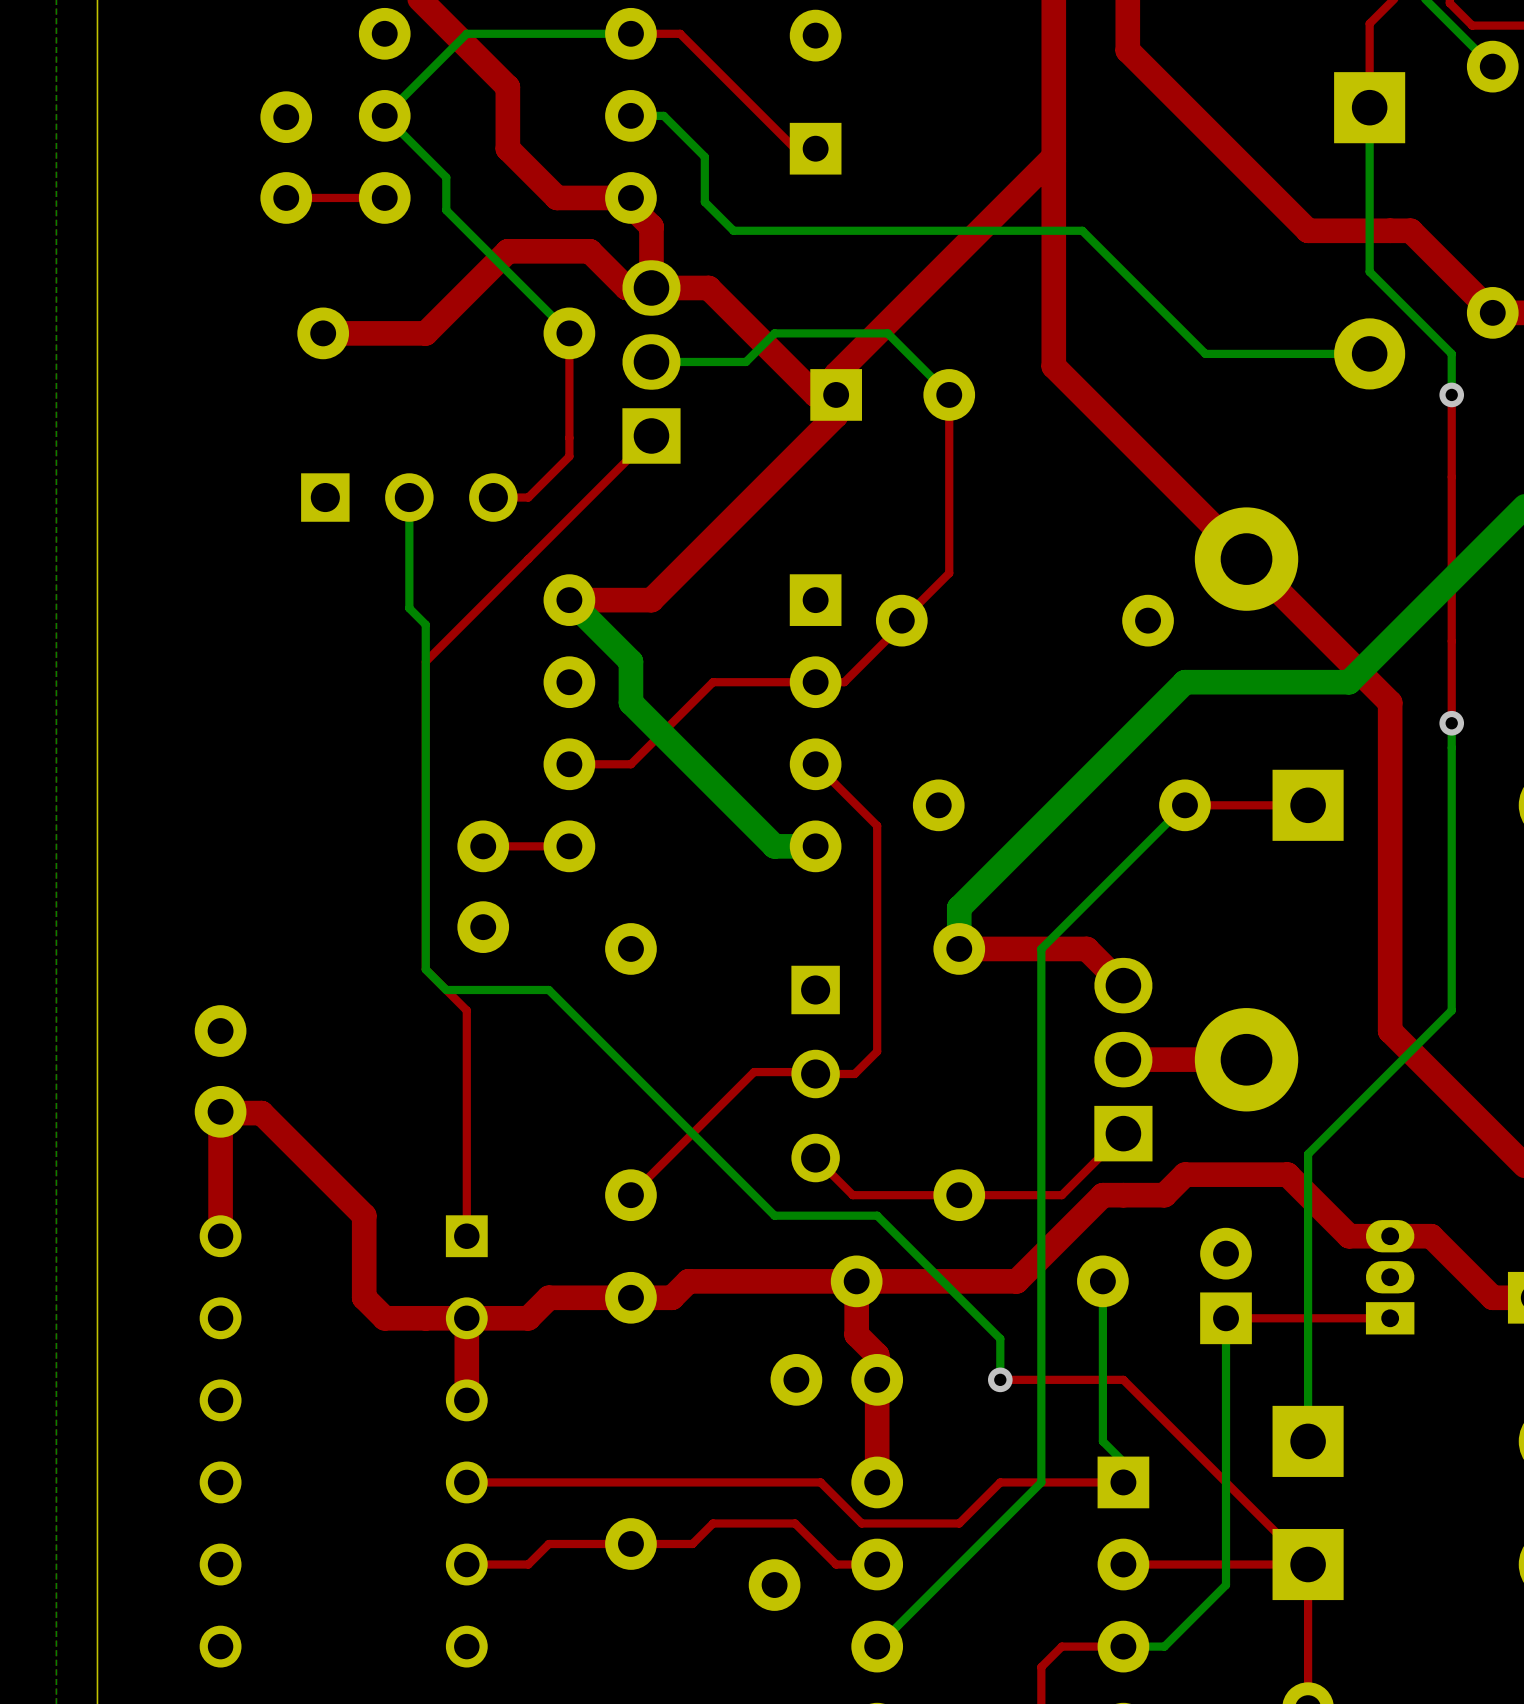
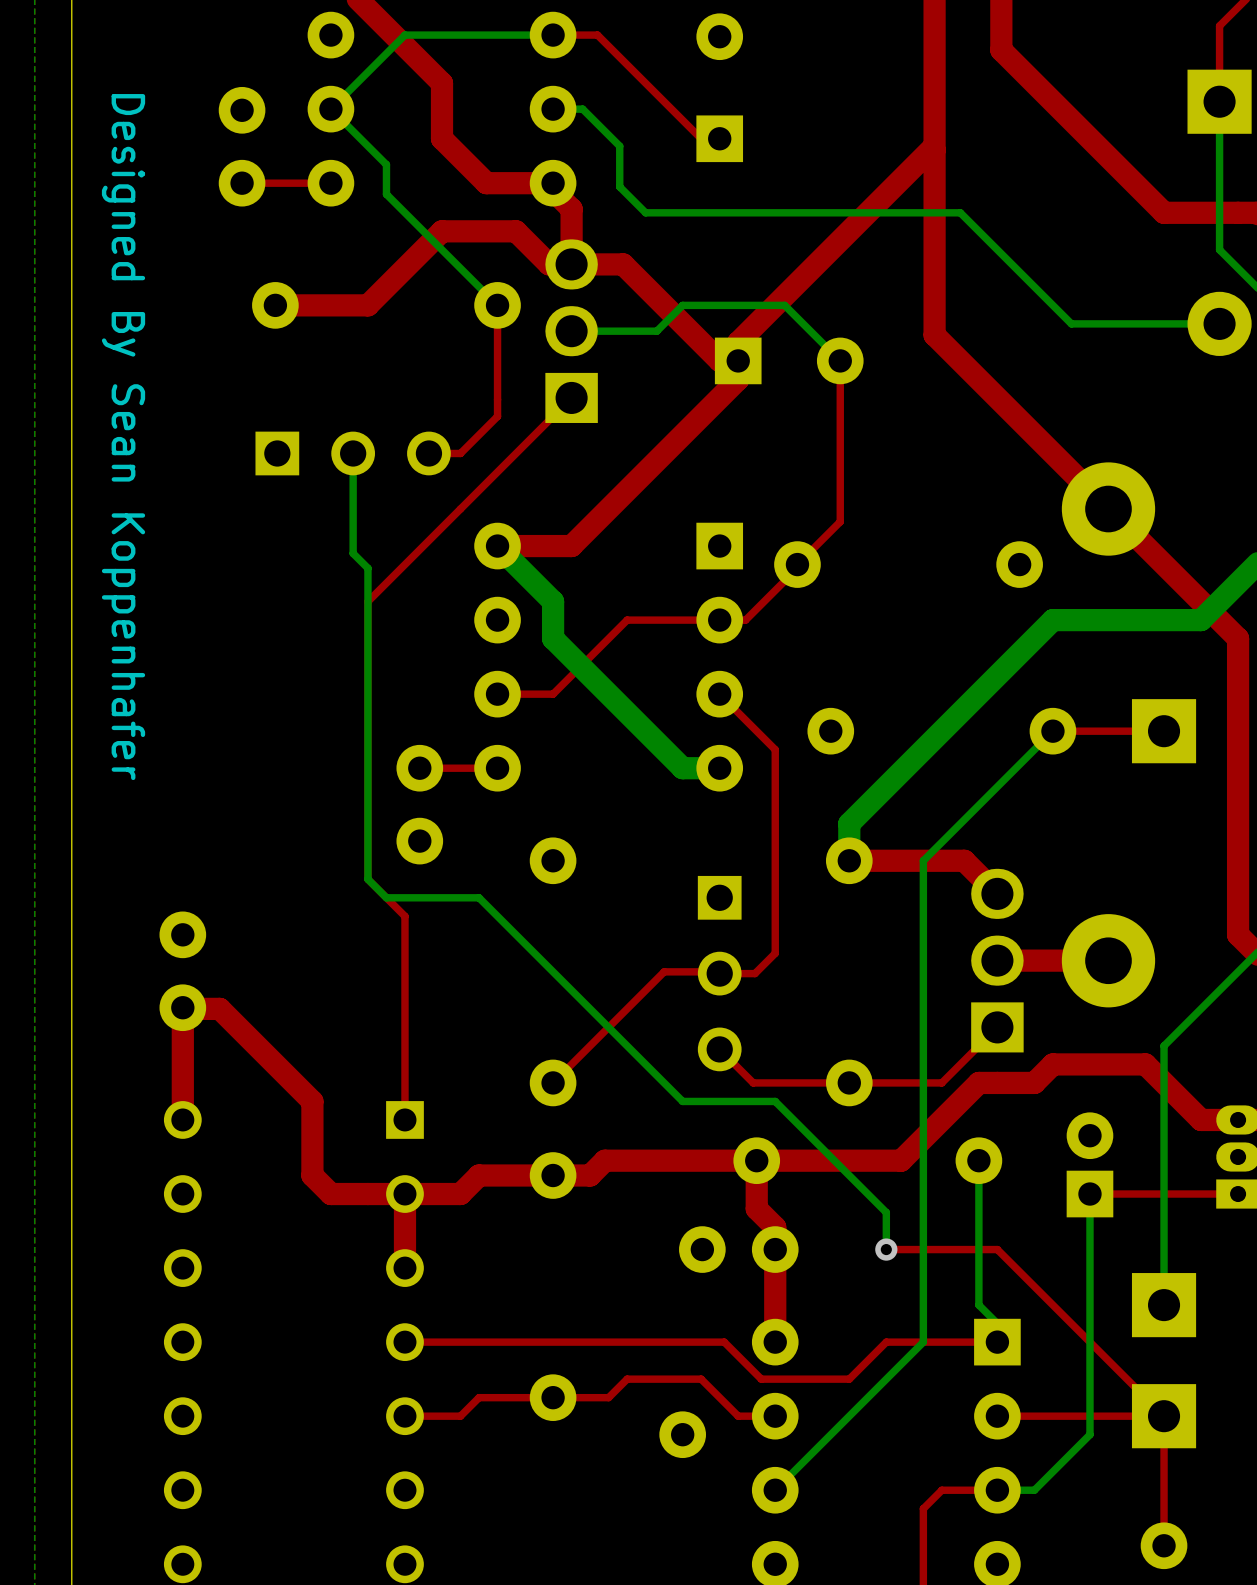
text: none -> Designed By Sean Koppenhafer (123, 437)

